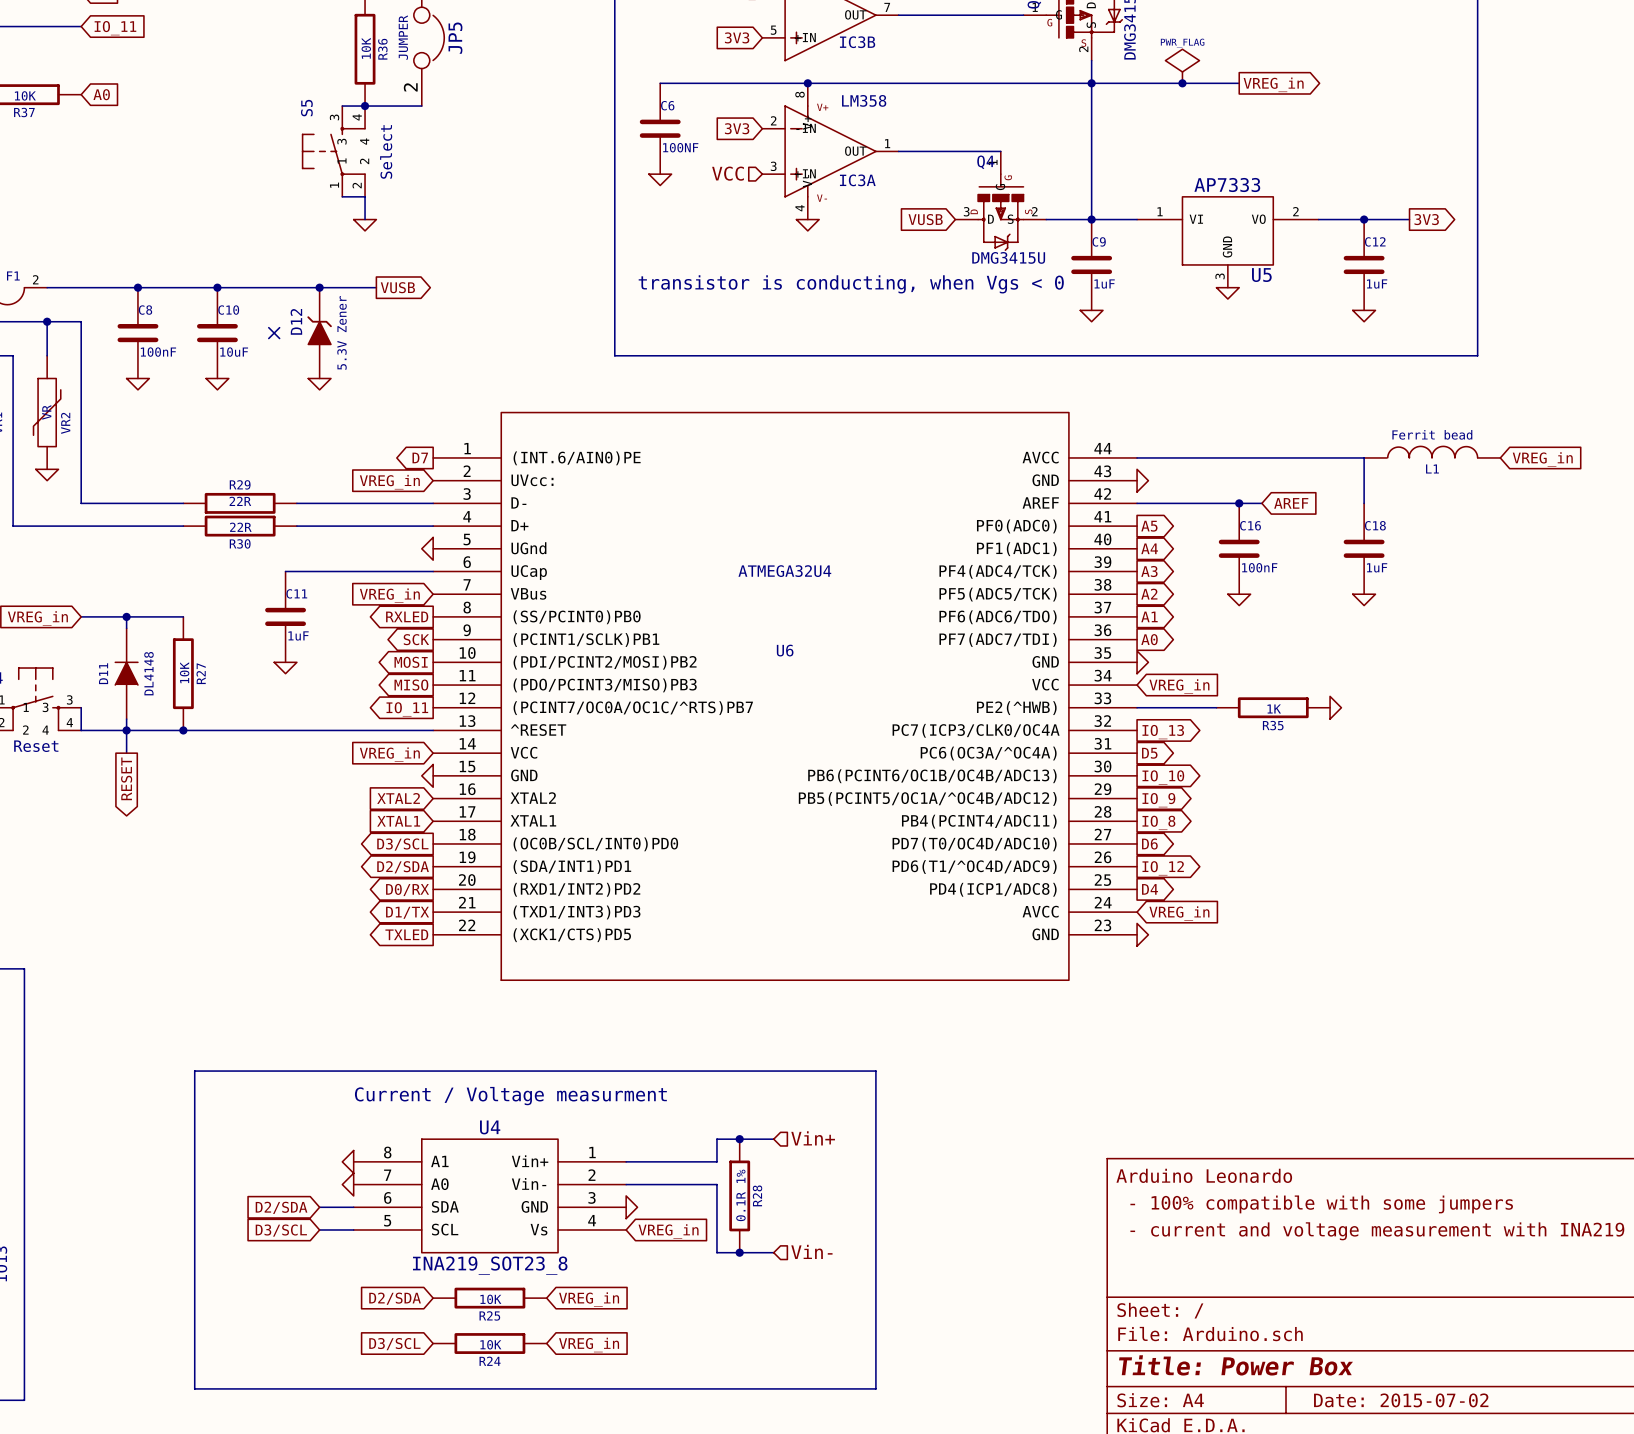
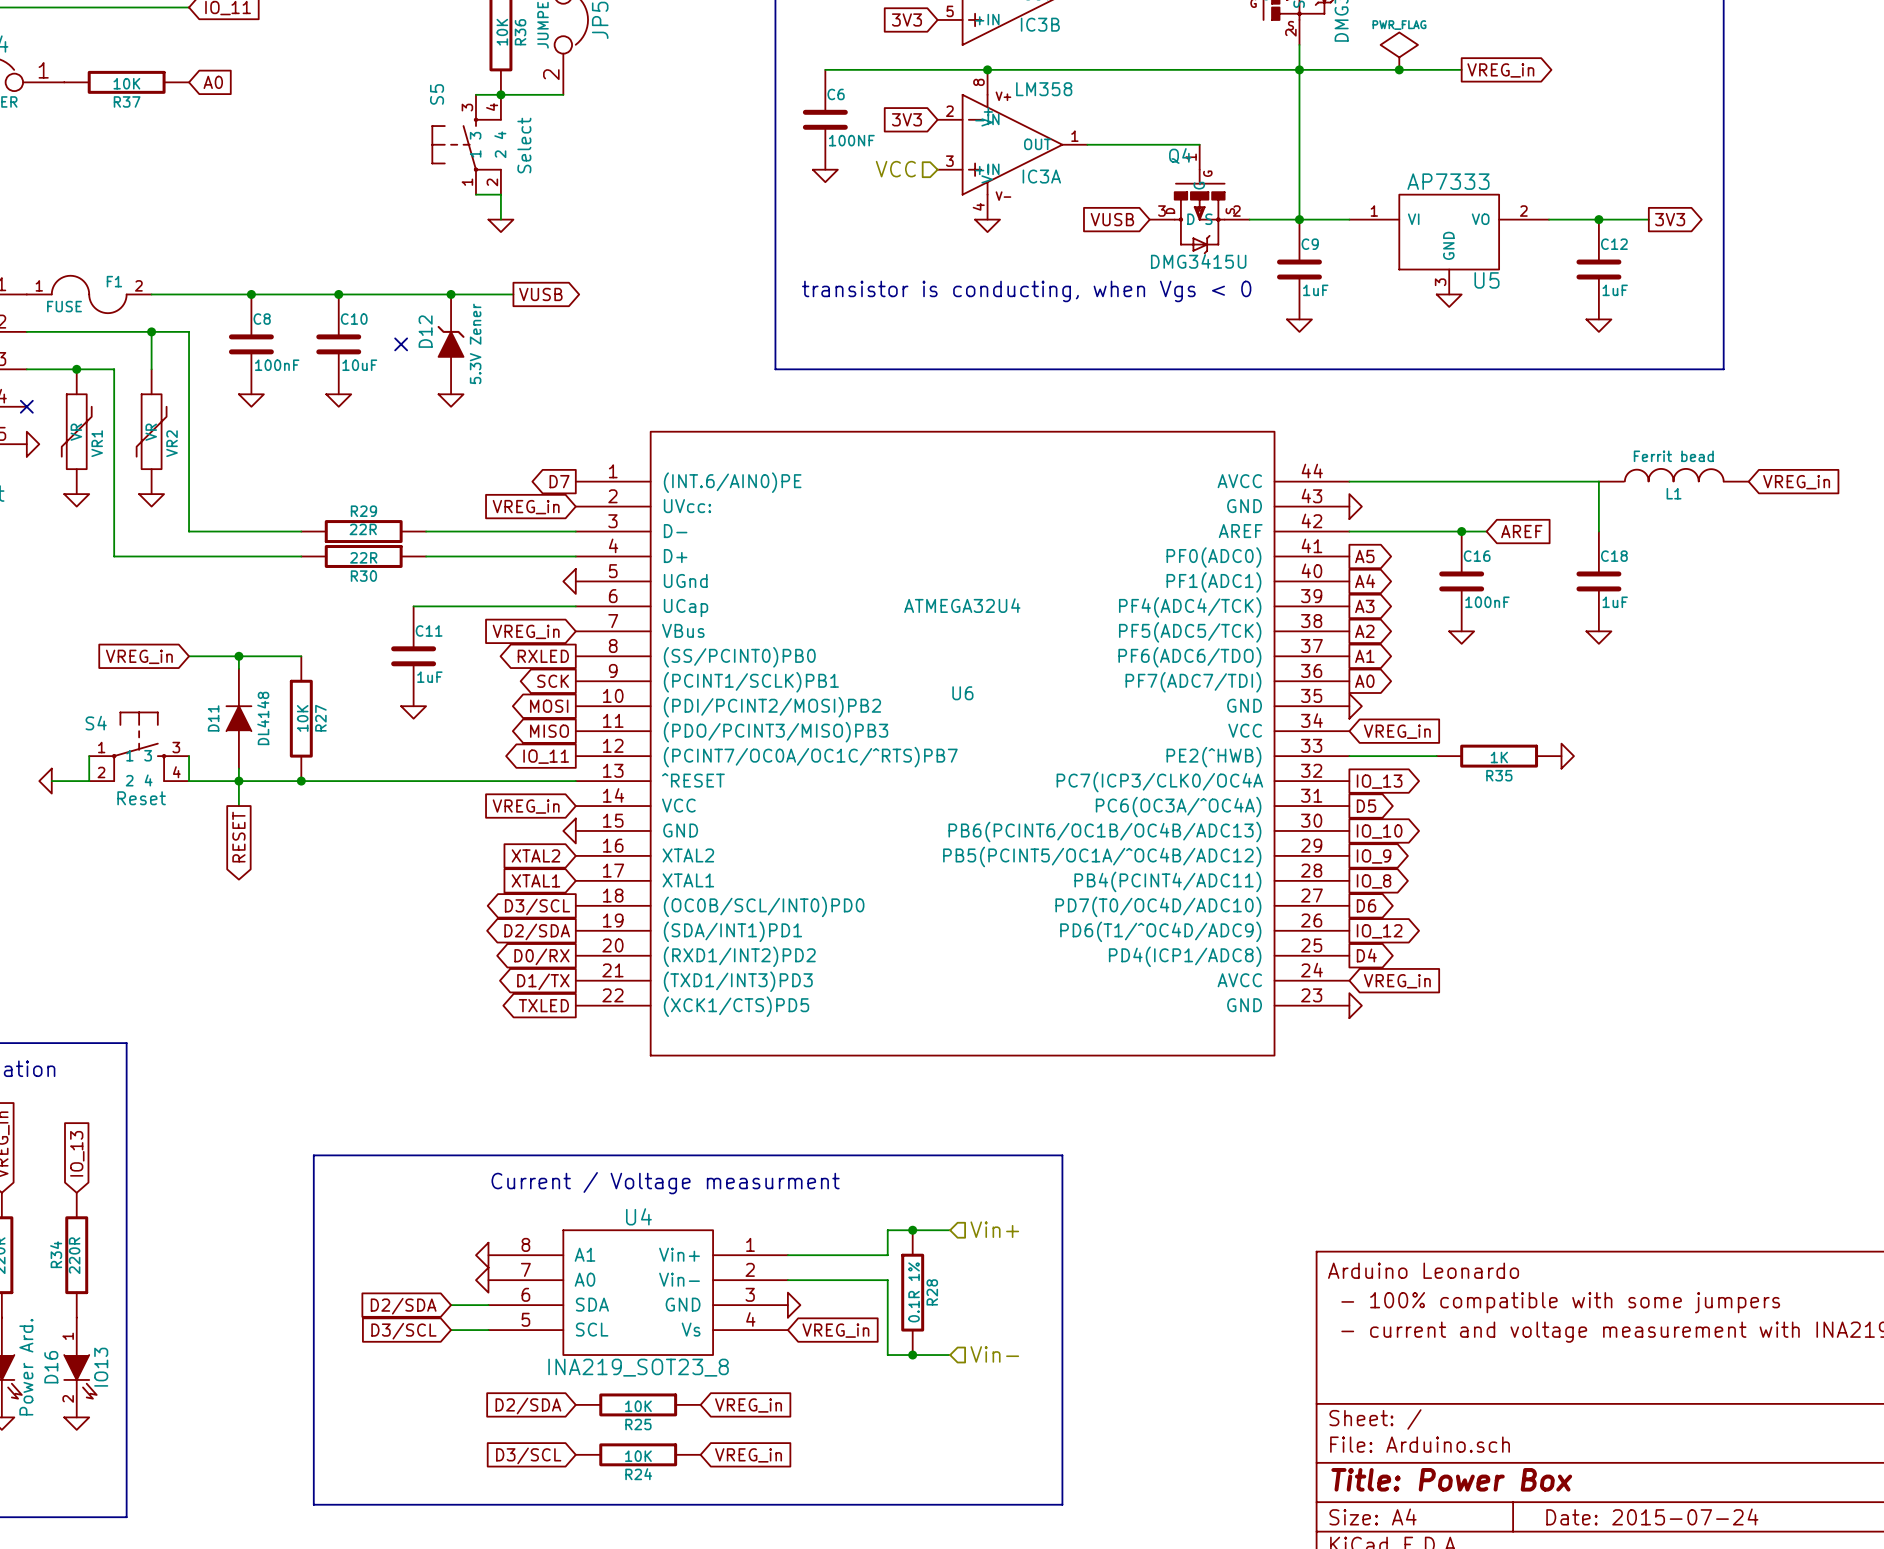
title block: Date: 2015-07-02 (1401, 1400) -> Date: 2015-07-24 (1652, 1516)

